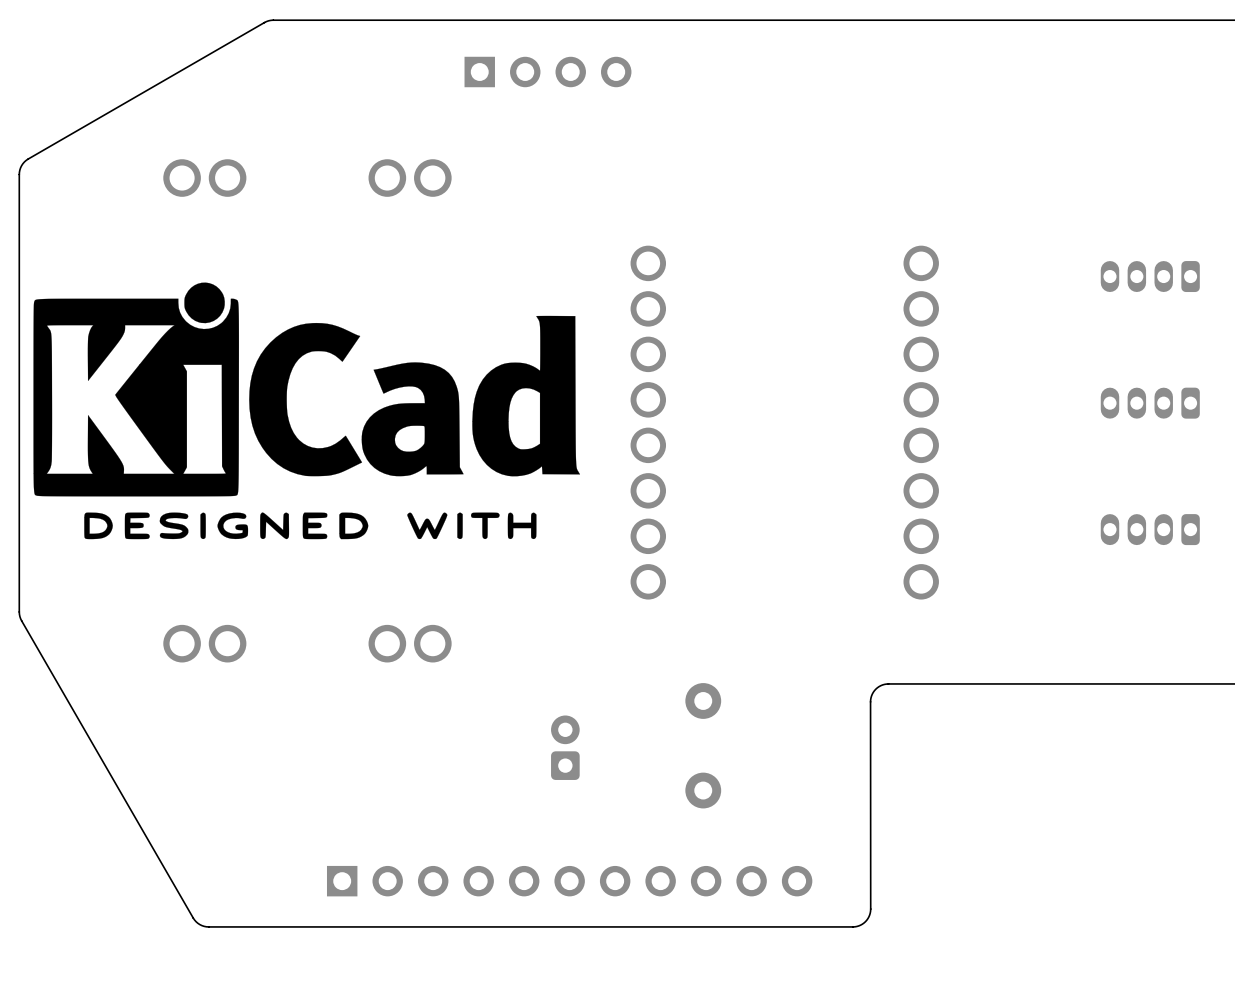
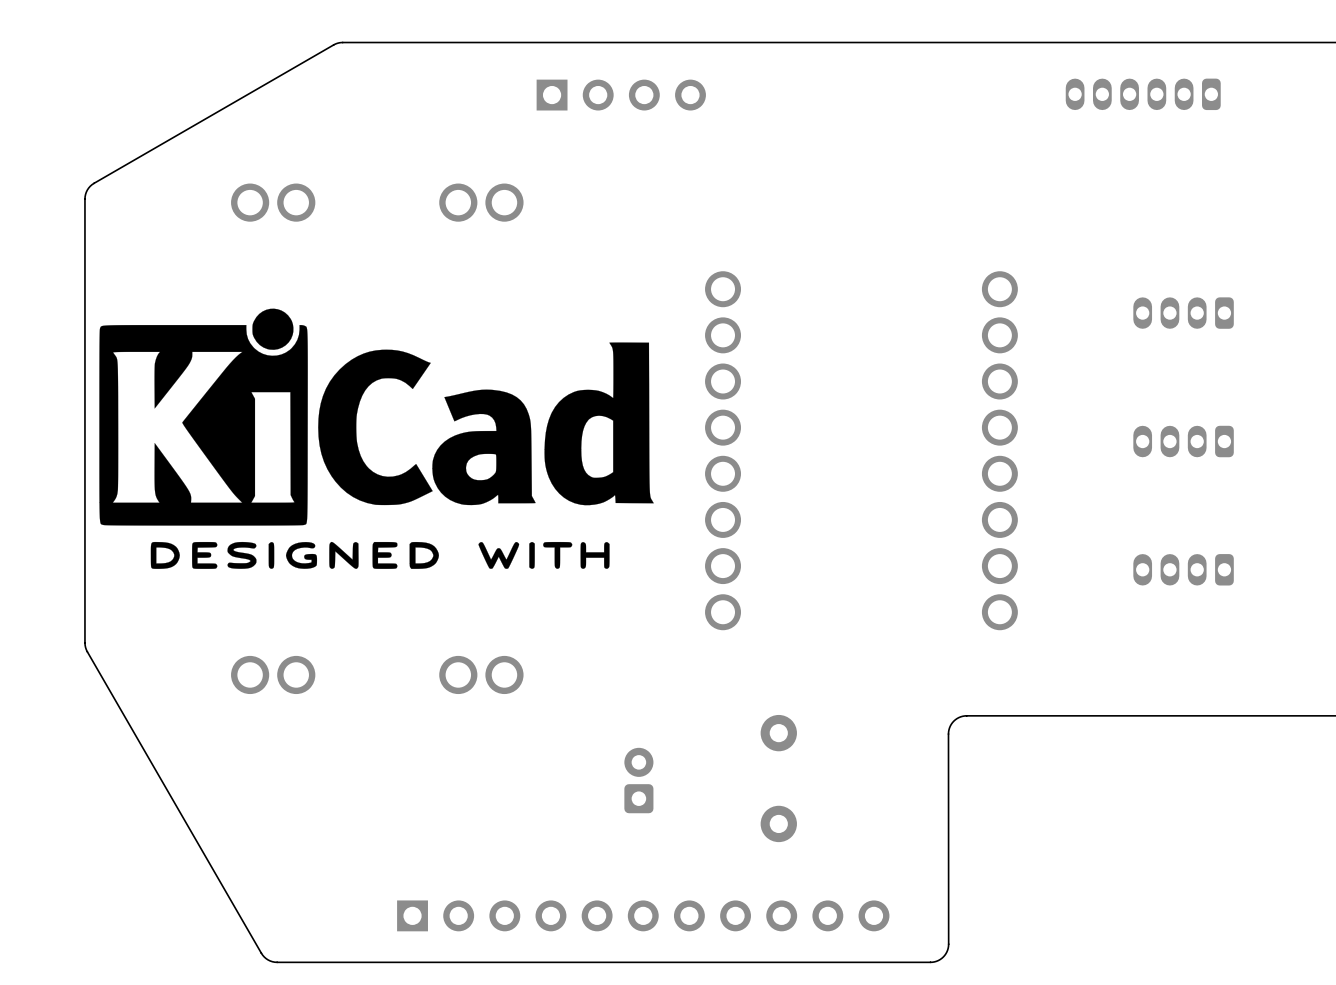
part: none -> (1143, 94)
part position: (1150, 276) -> (1183, 313)
part position: (1150, 403) -> (1183, 441)
part position: (1150, 529) -> (1183, 569)

